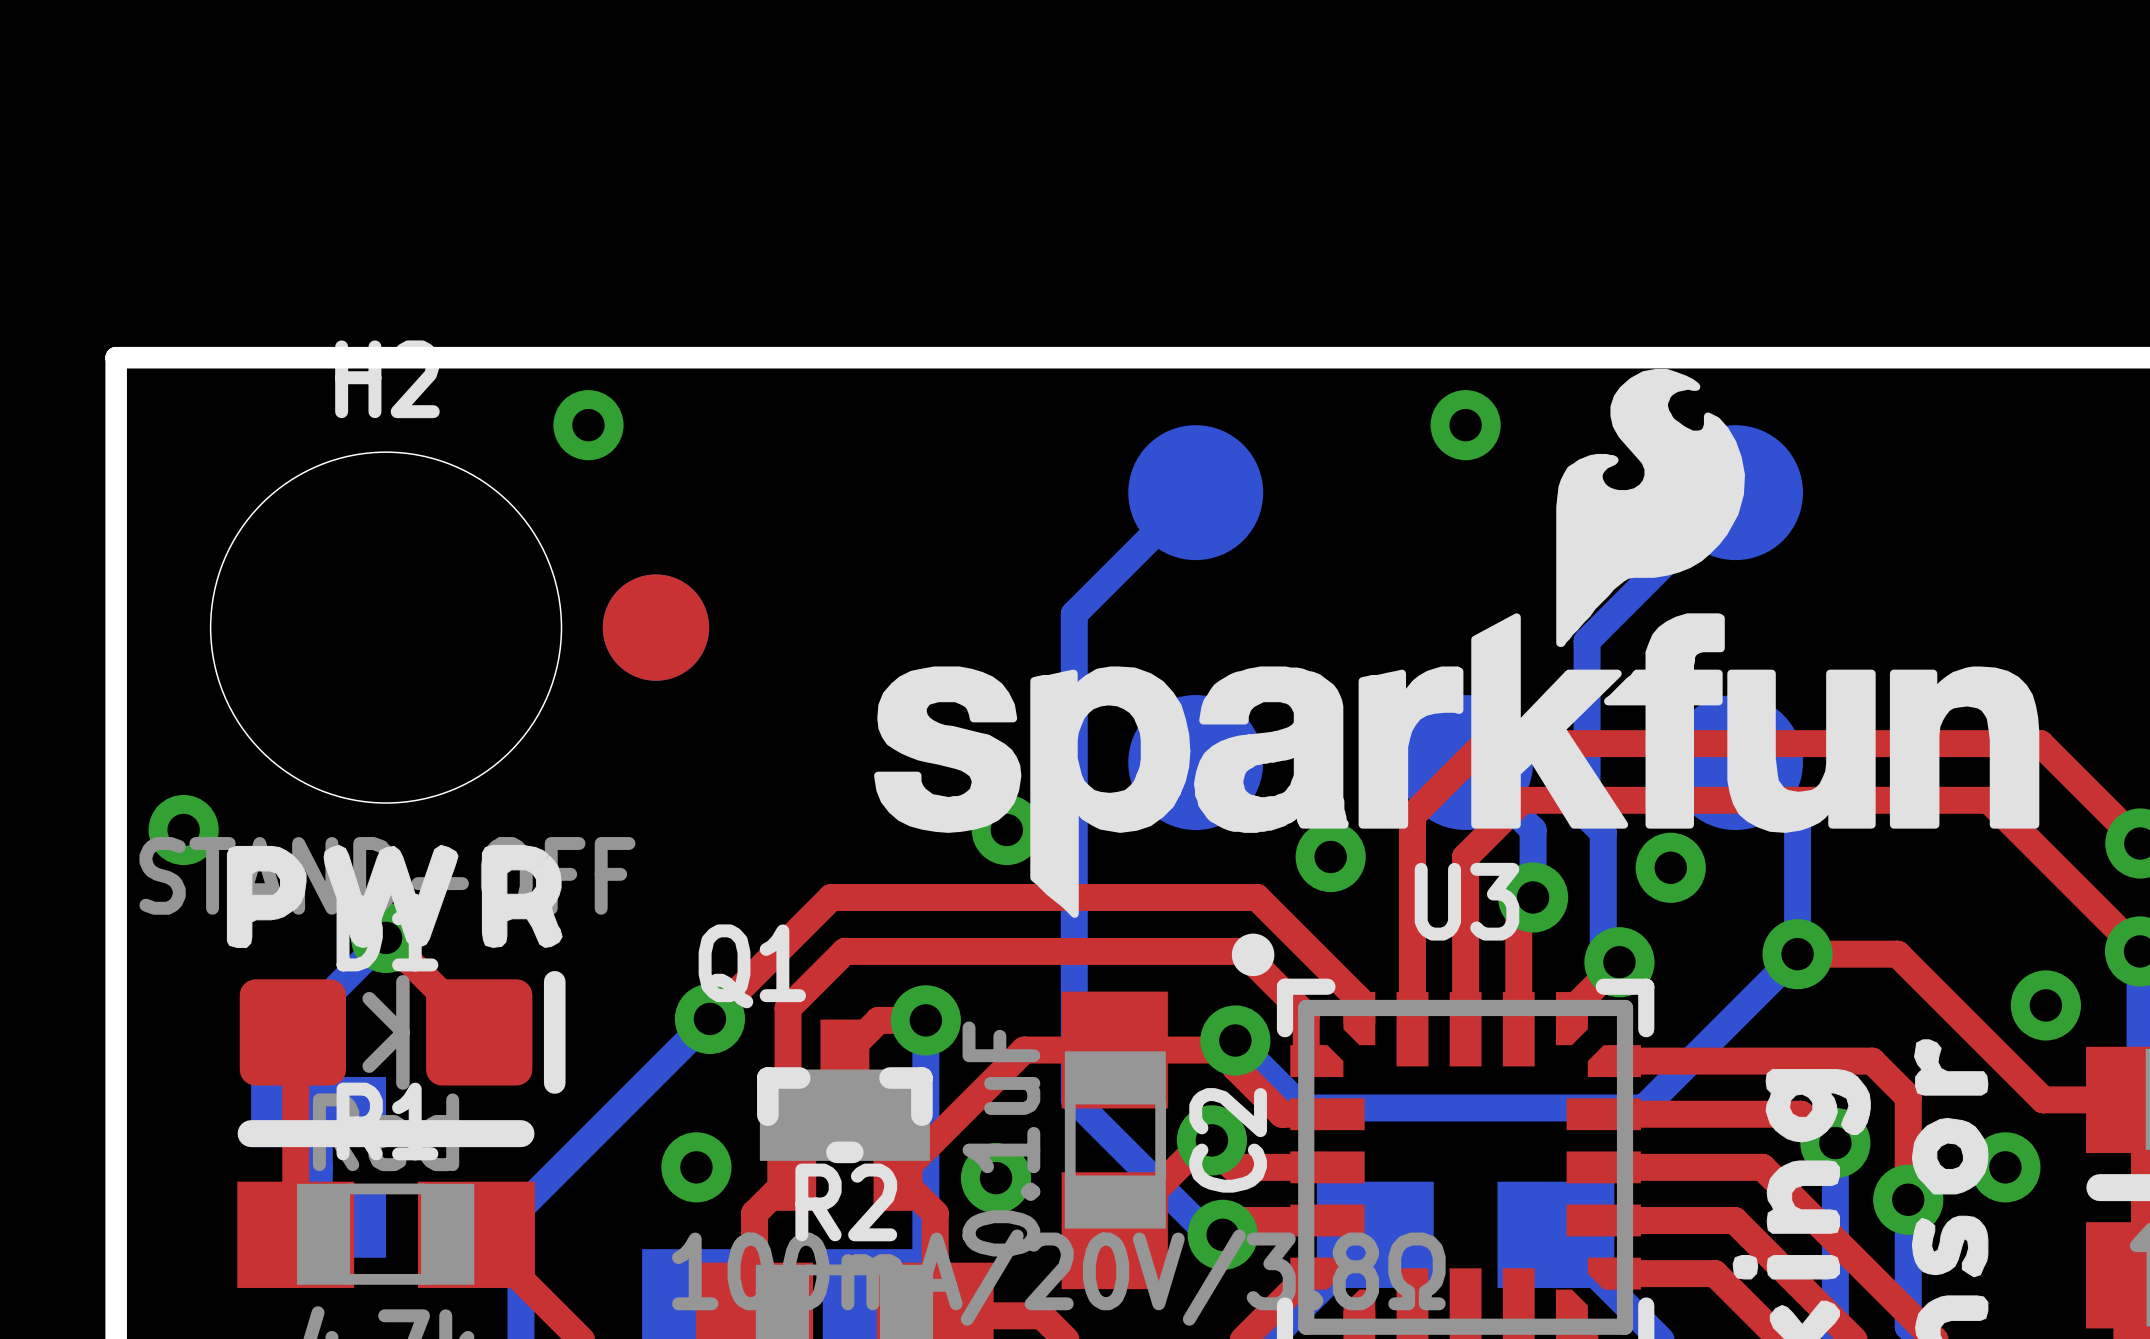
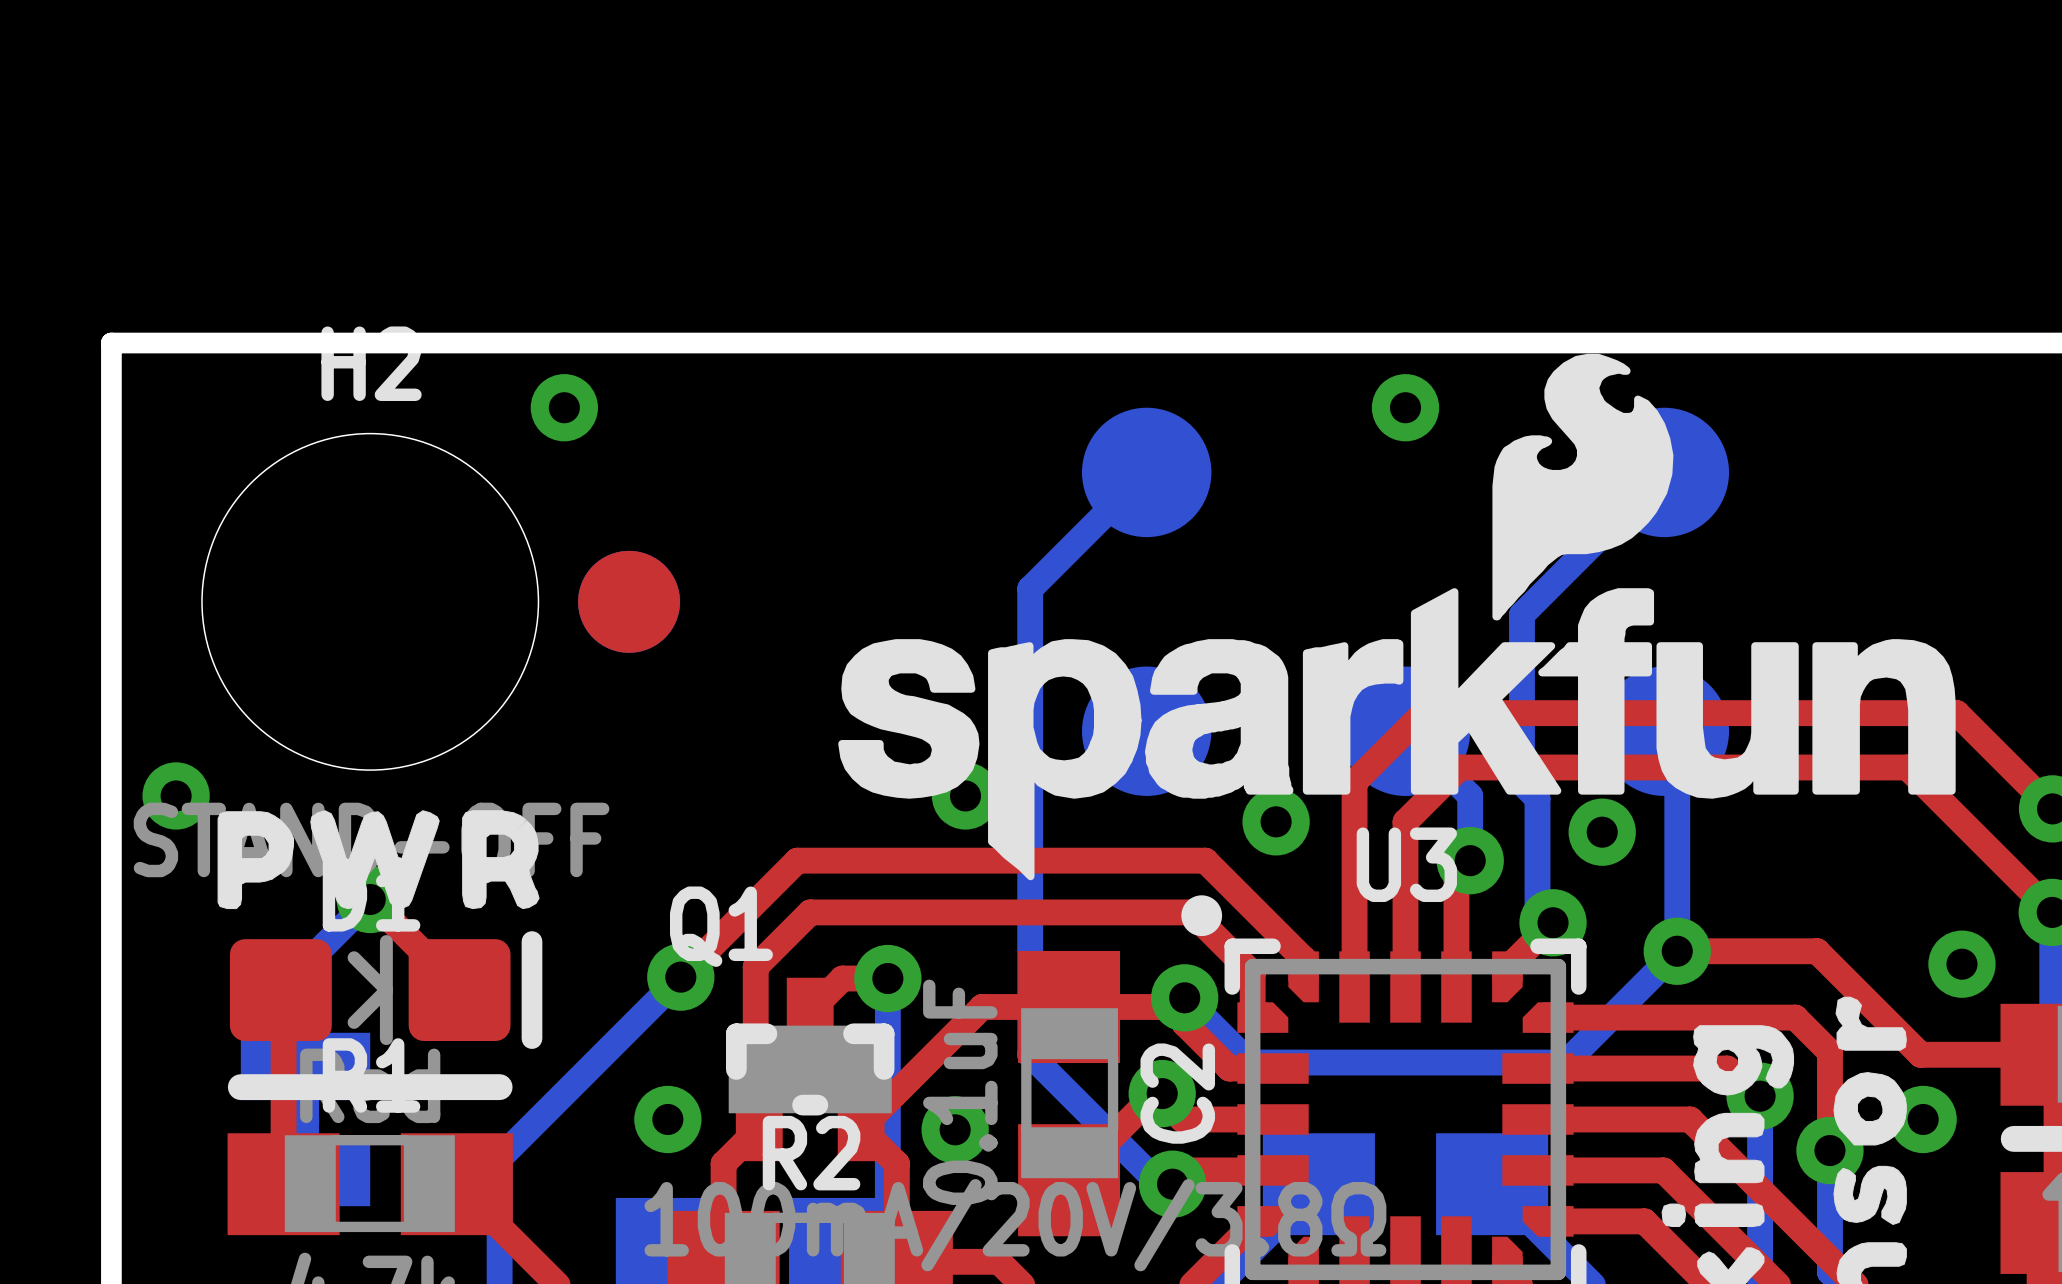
bottom track: (1749, 776) (1797, 824) (1797, 954) (1643, 1107) (1632, 1107) -> (1677, 744) (1677, 951) (1565, 1062)
top track: (1797, 954) (1897, 954) (2043, 1099) -> (1677, 951) (1817, 951) (1920, 1054) (1959, 1054)
via position: (1797, 954) -> (1677, 951)

